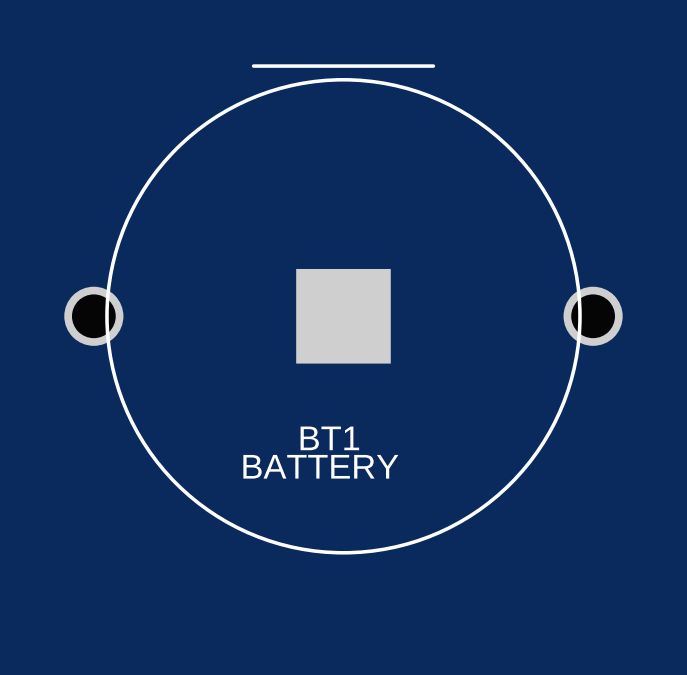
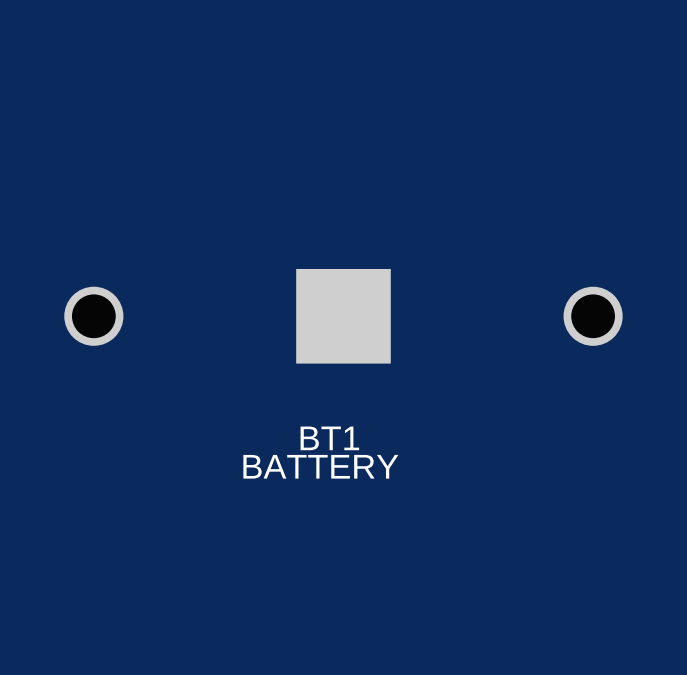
BT1 footprint: [64, 64, 623, 555] -> [64, 268, 623, 364]

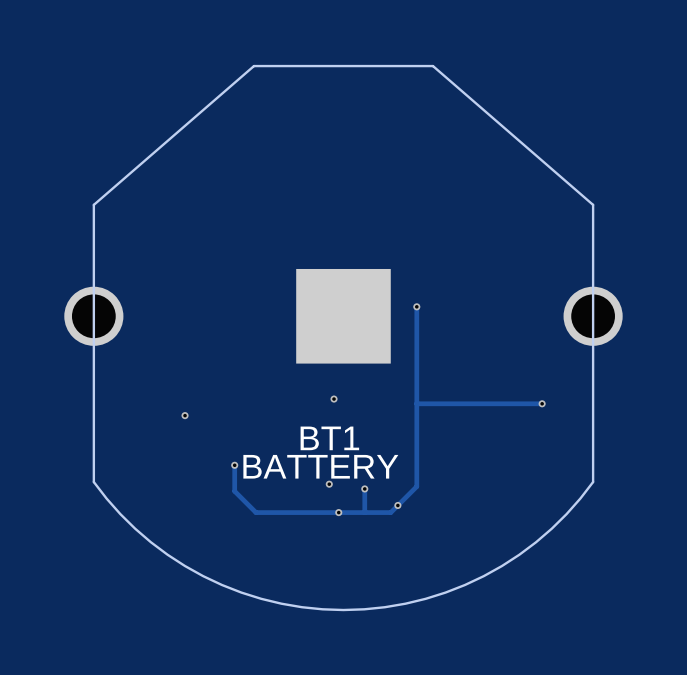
board edge: none -> (432, 66) (253, 66) (93, 204) (93, 482) (135, 528) (167, 554) (203, 576) (241, 592) (301, 607) (343, 610) (384, 607) (445, 592) (483, 576) (519, 554) (566, 514) (593, 482) (593, 204) (432, 66)
track: none -> (416, 306) (416, 486) (390, 512) (255, 512) (234, 491) (234, 465)
via: none -> (416, 306)
via: none -> (334, 399)
track: none -> (542, 403) (416, 403)
via: none -> (542, 403)
via: none -> (185, 415)
via: none -> (234, 465)
via: none -> (329, 484)
track: none -> (364, 488) (364, 512)
via: none -> (364, 488)
via: none -> (397, 505)
via: none -> (338, 512)

